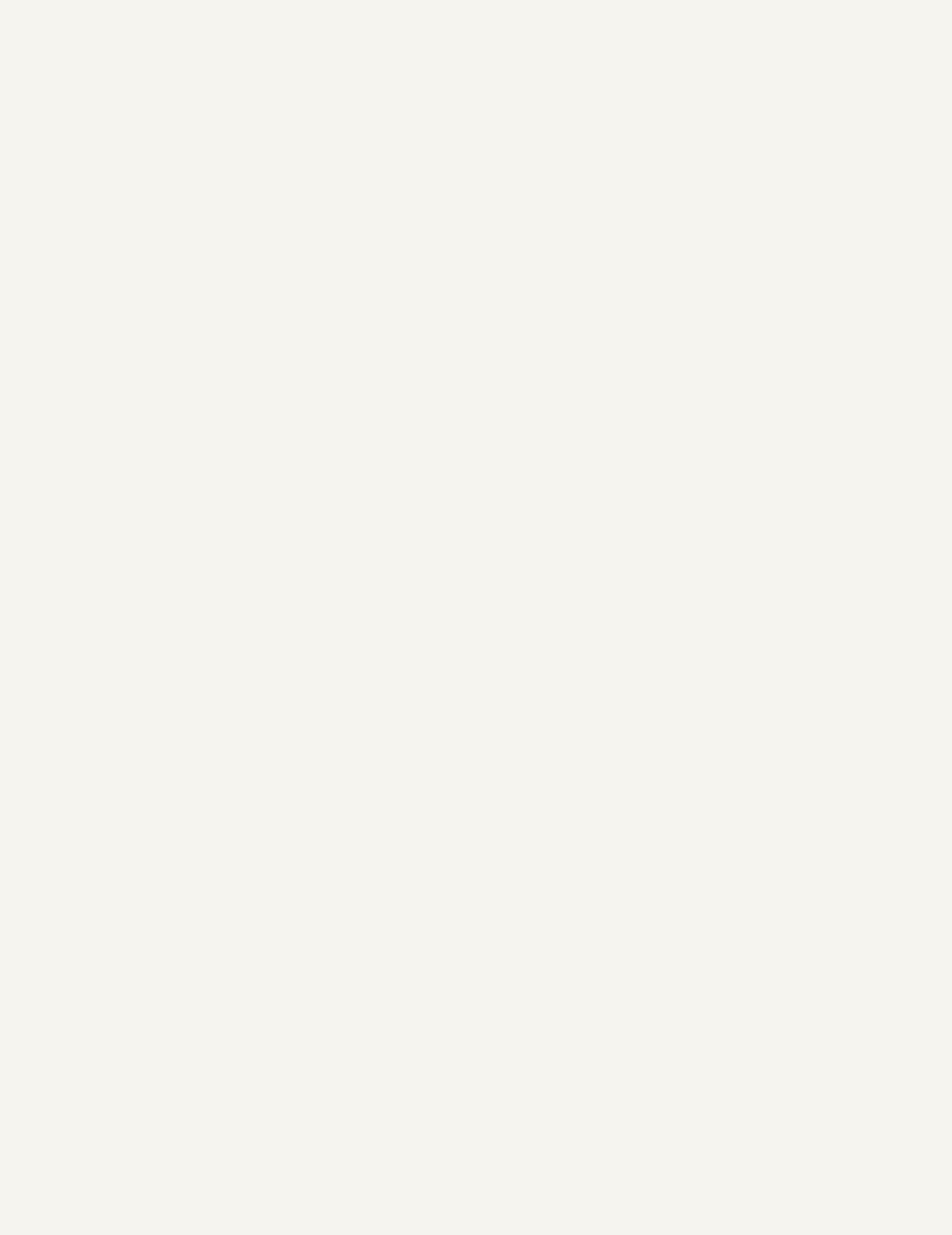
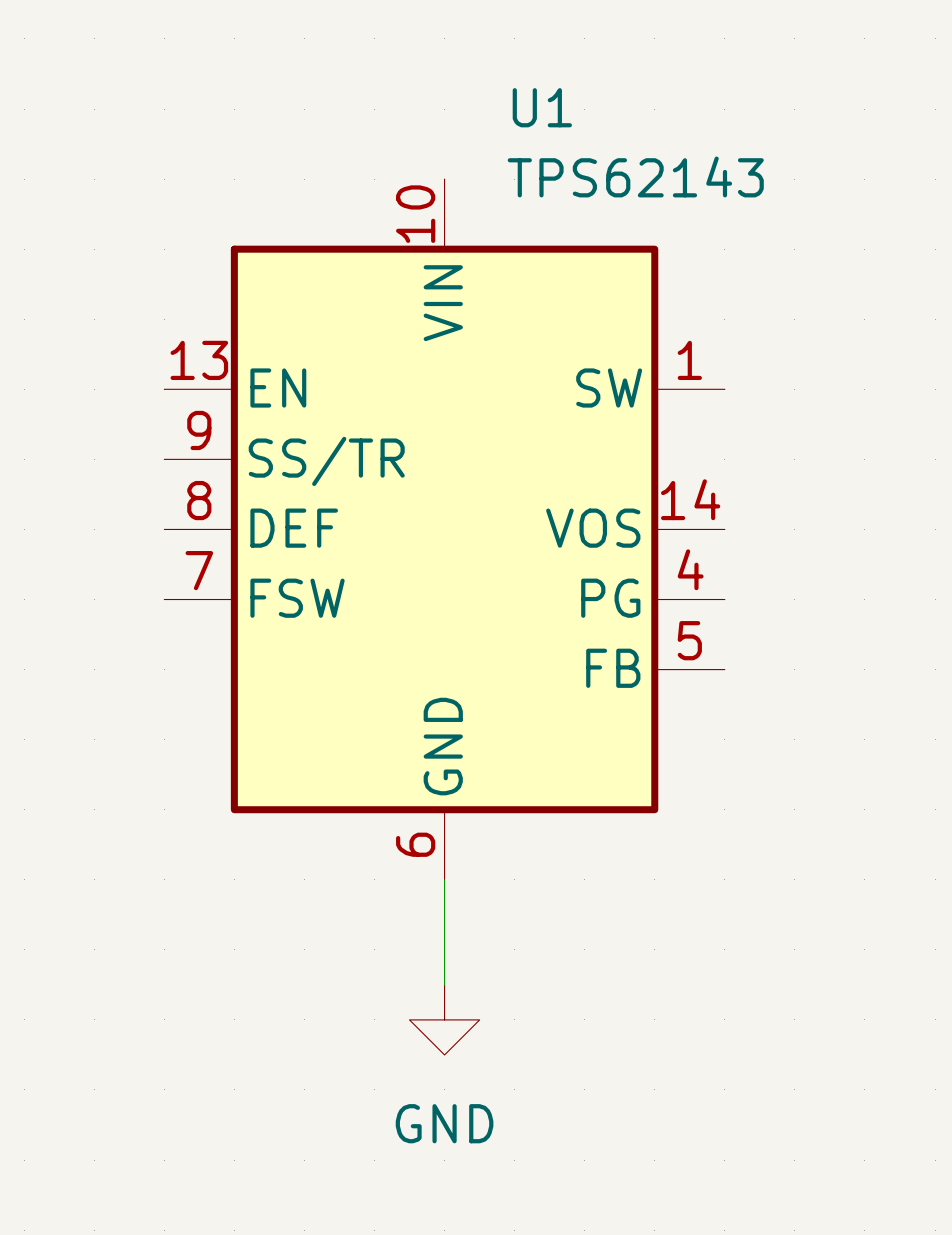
U1: none -> TPS62143 (444, 529)
wire: none -> (444, 879) (444, 984)
power symbol: none -> GND (444, 1019)

